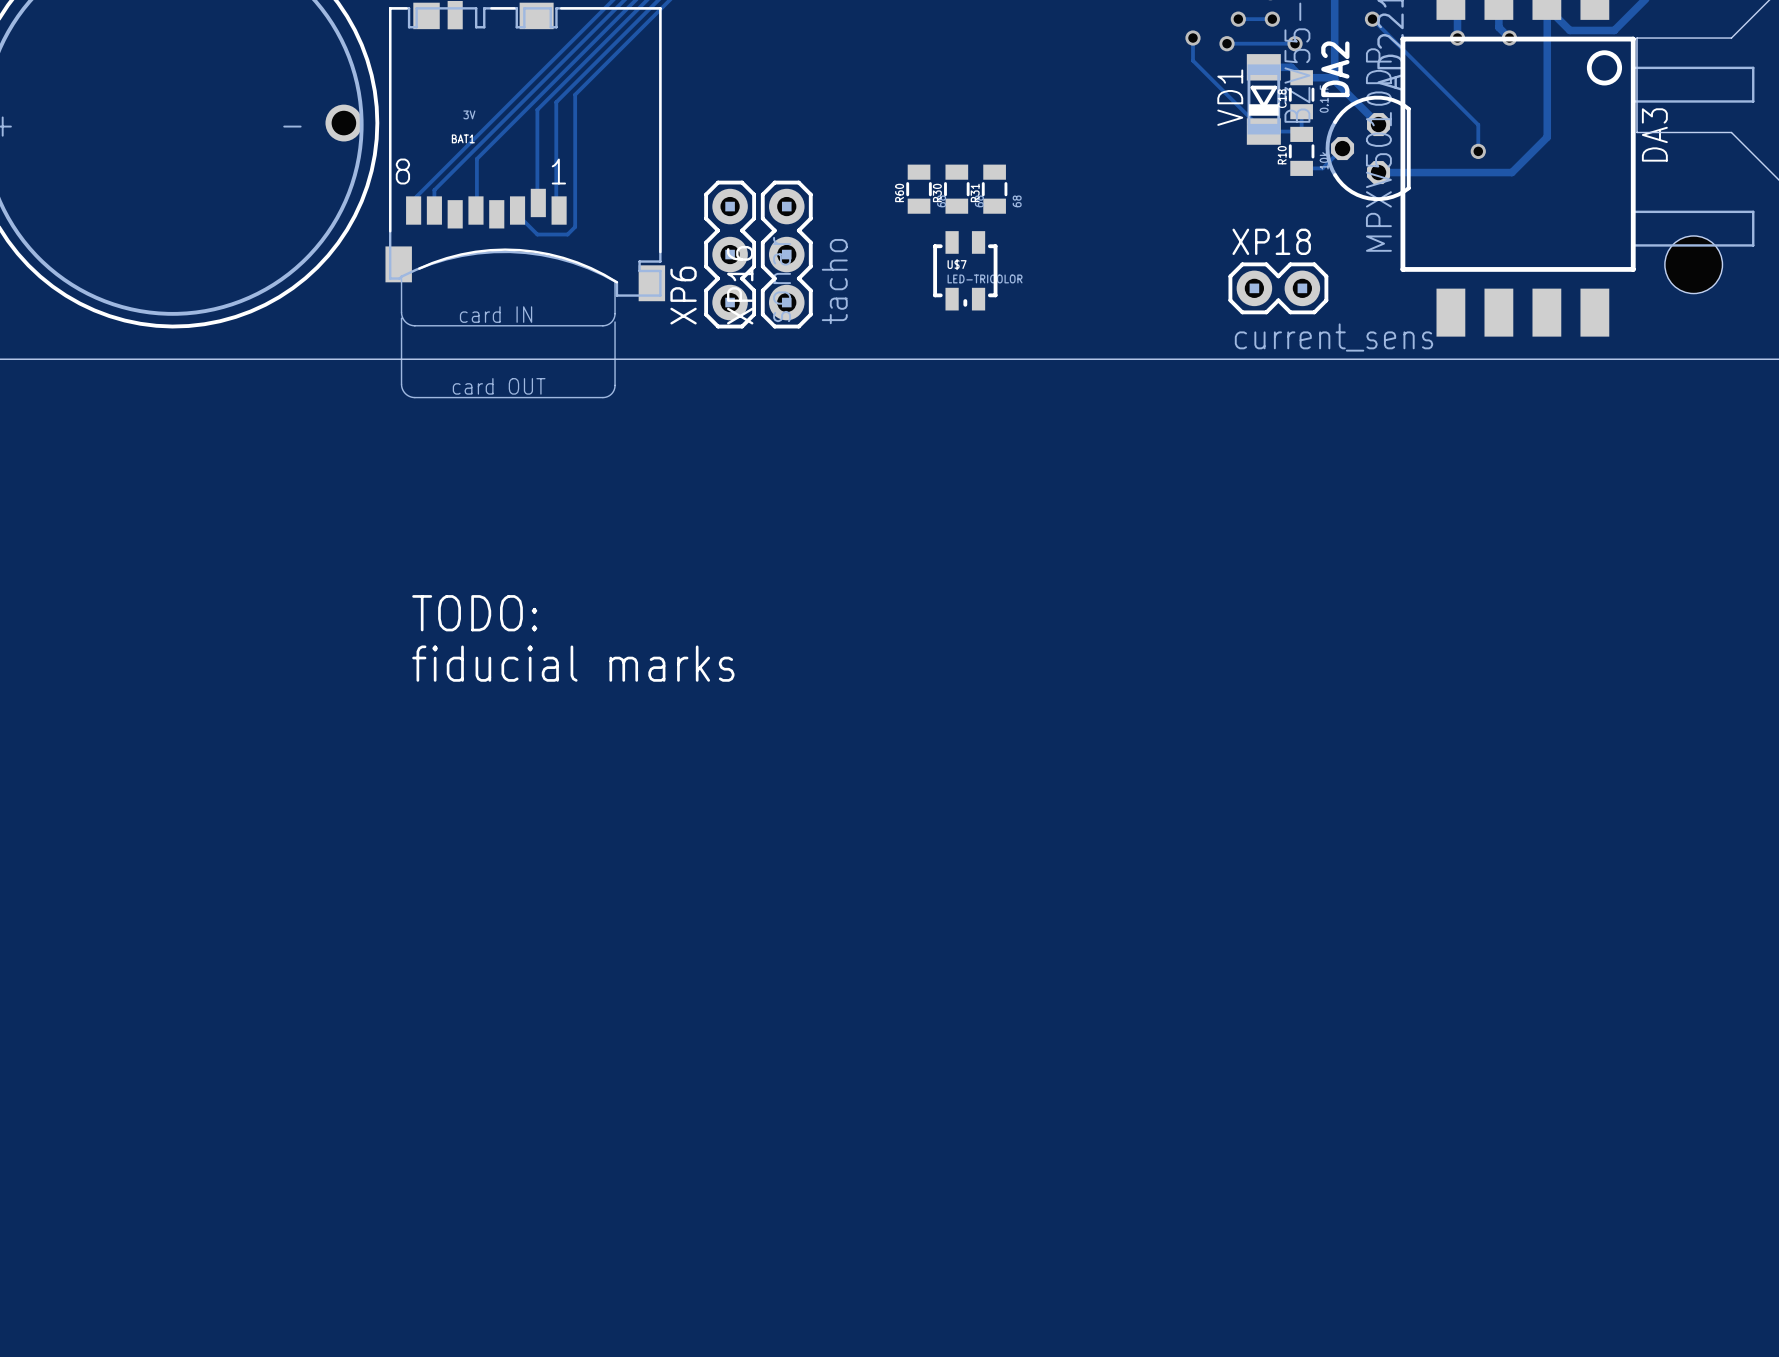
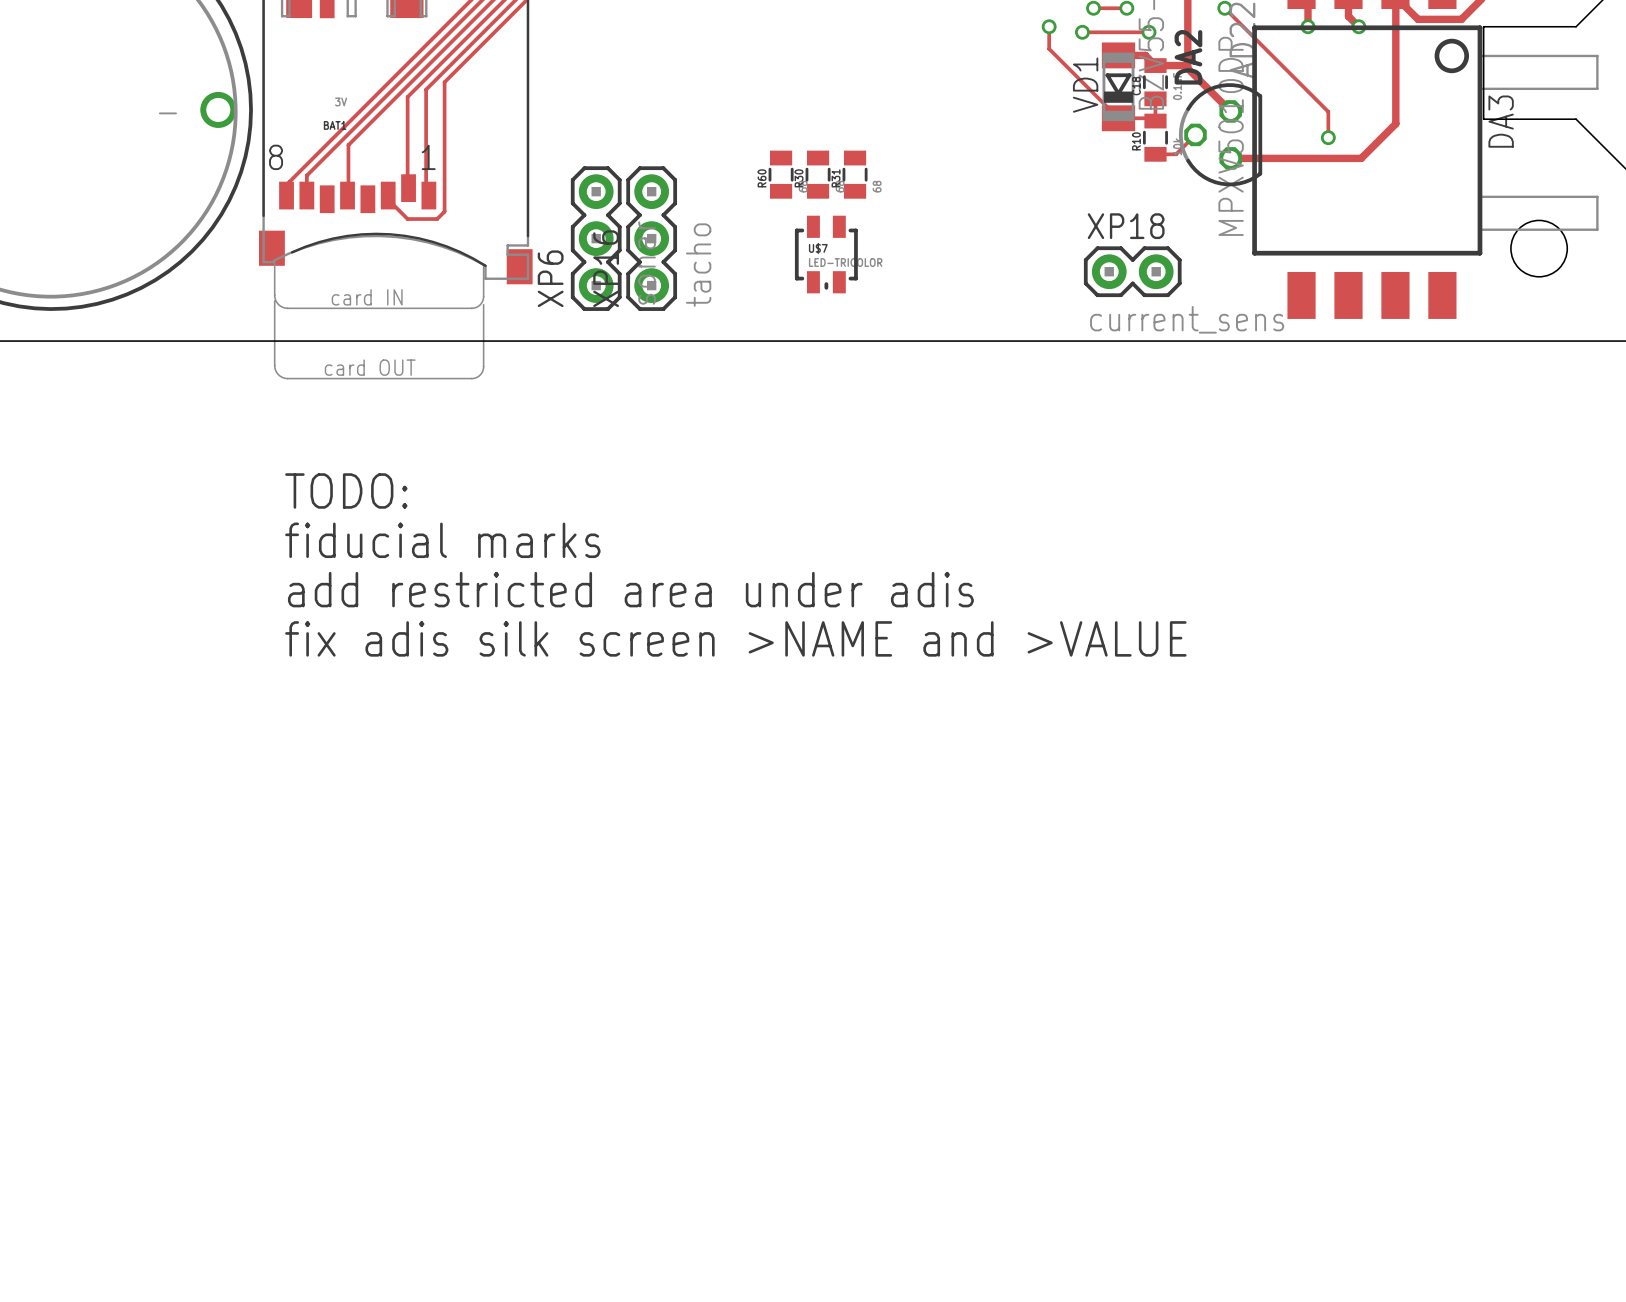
text: none -> TODO: (346, 490)
text: none -> fiducial marks (442, 540)
text: TODO: (474, 613) -> add restricted area under adis (630, 589)
text: fiducial marks (573, 663) -> fix adis silk screen >NAME and >VALUE (735, 638)

